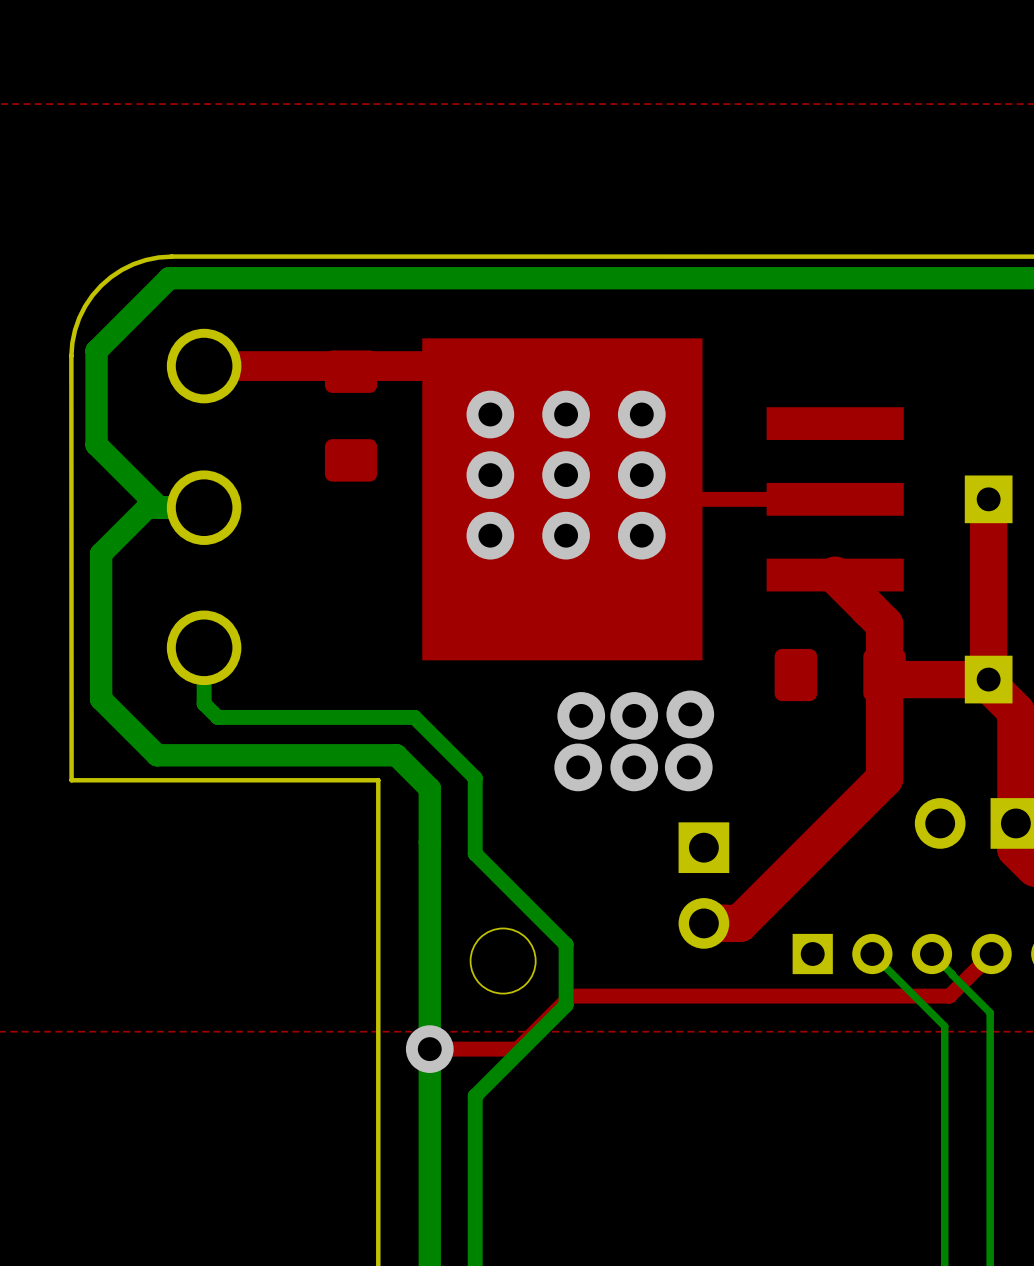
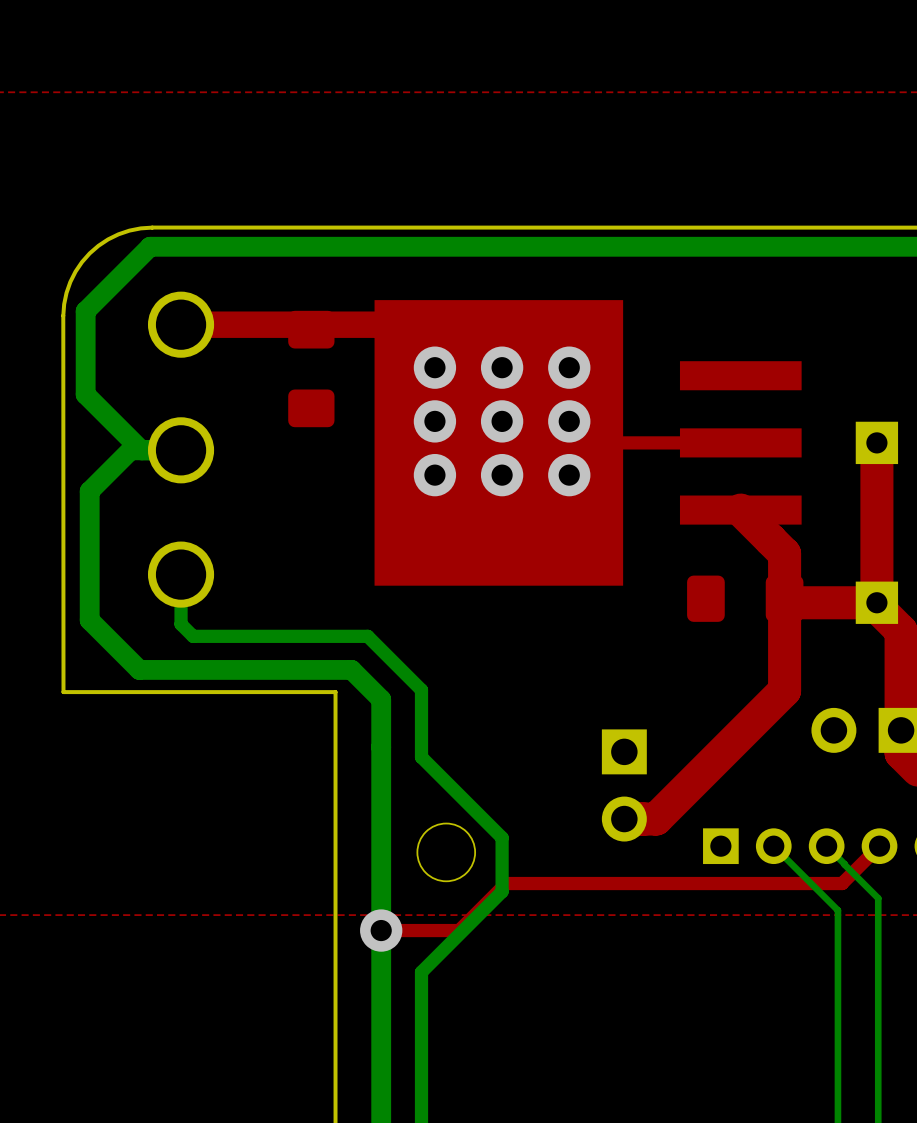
via: (690, 714) -> none
via: (581, 715) -> none
via: (634, 715) -> none
via: (578, 767) -> none
via: (634, 767) -> none
via: (688, 767) -> none

